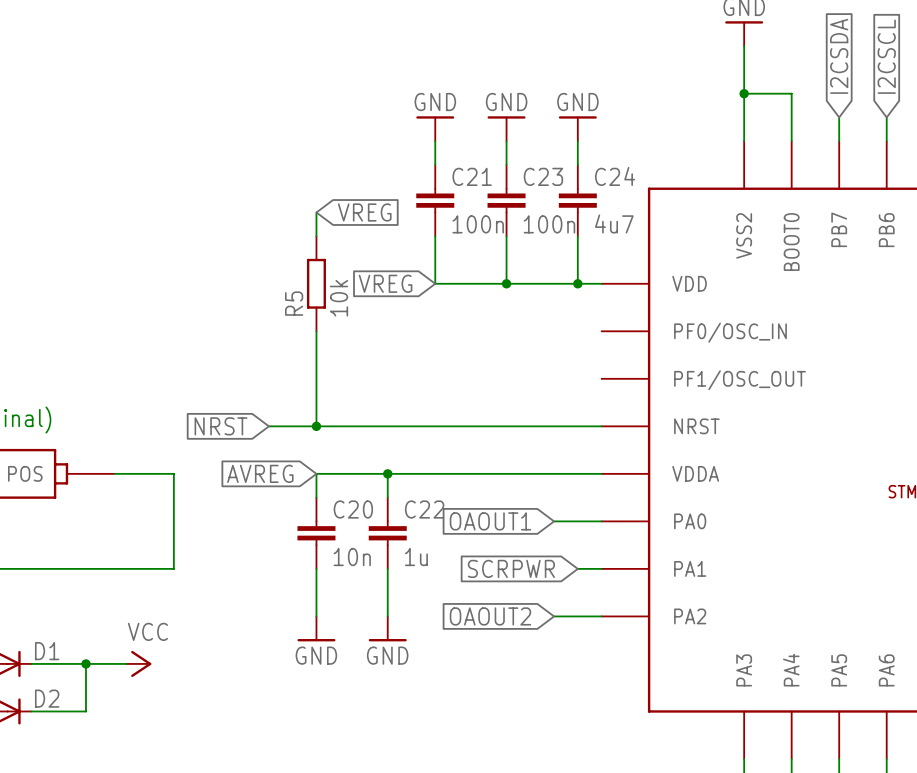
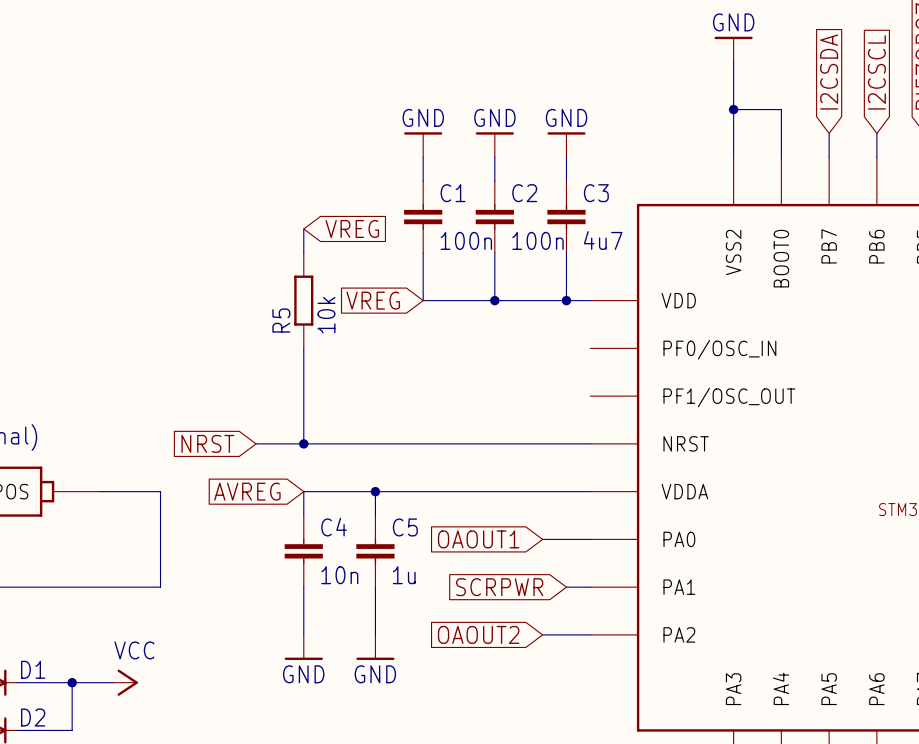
C21 name: C21 (472, 176) -> C1 (453, 193)
C23 name: C23 (543, 176) -> C2 (524, 193)
C24 name: C24 (615, 176) -> C3 (596, 193)
C20 name: C20 (353, 509) -> C4 (334, 527)
C22 name: C22 (424, 509) -> C5 (405, 527)

